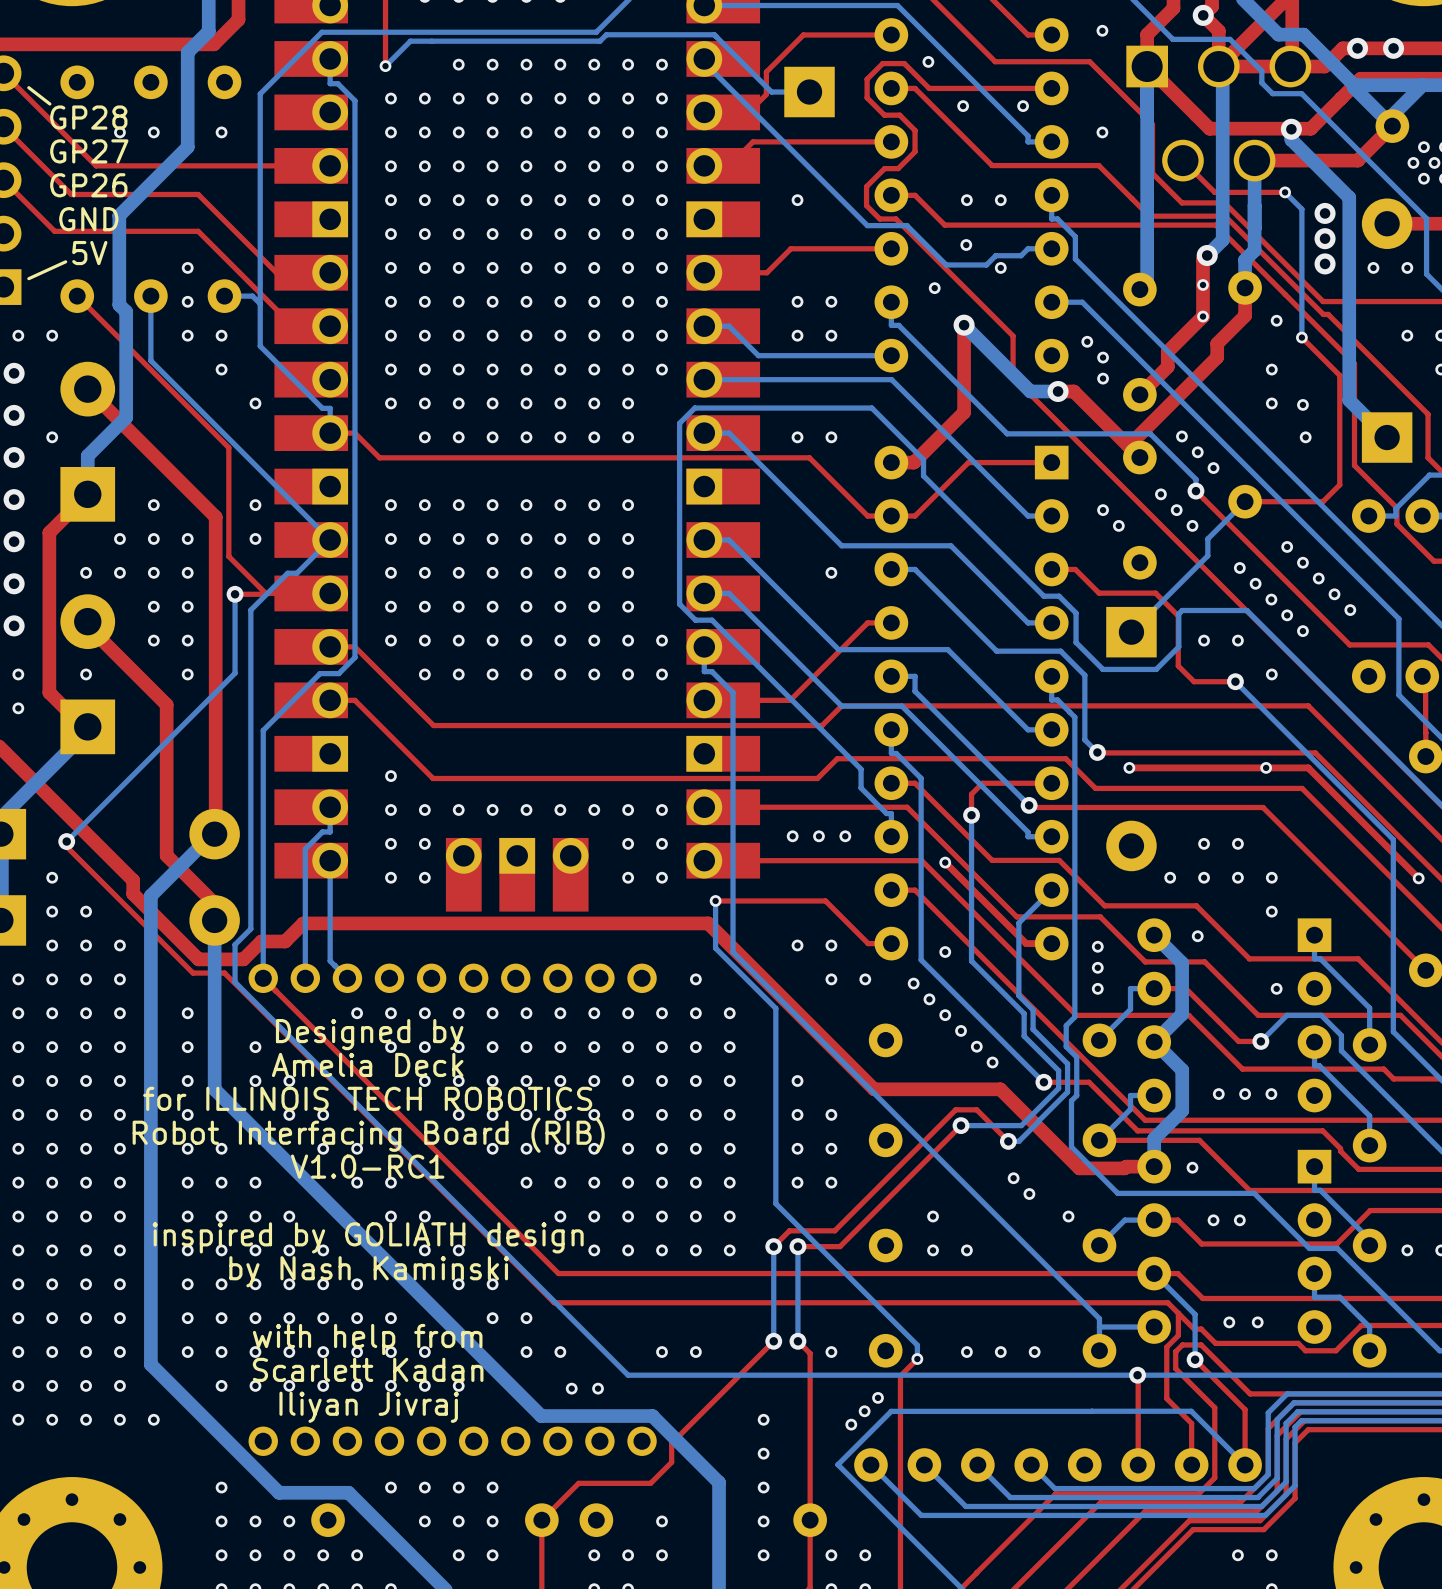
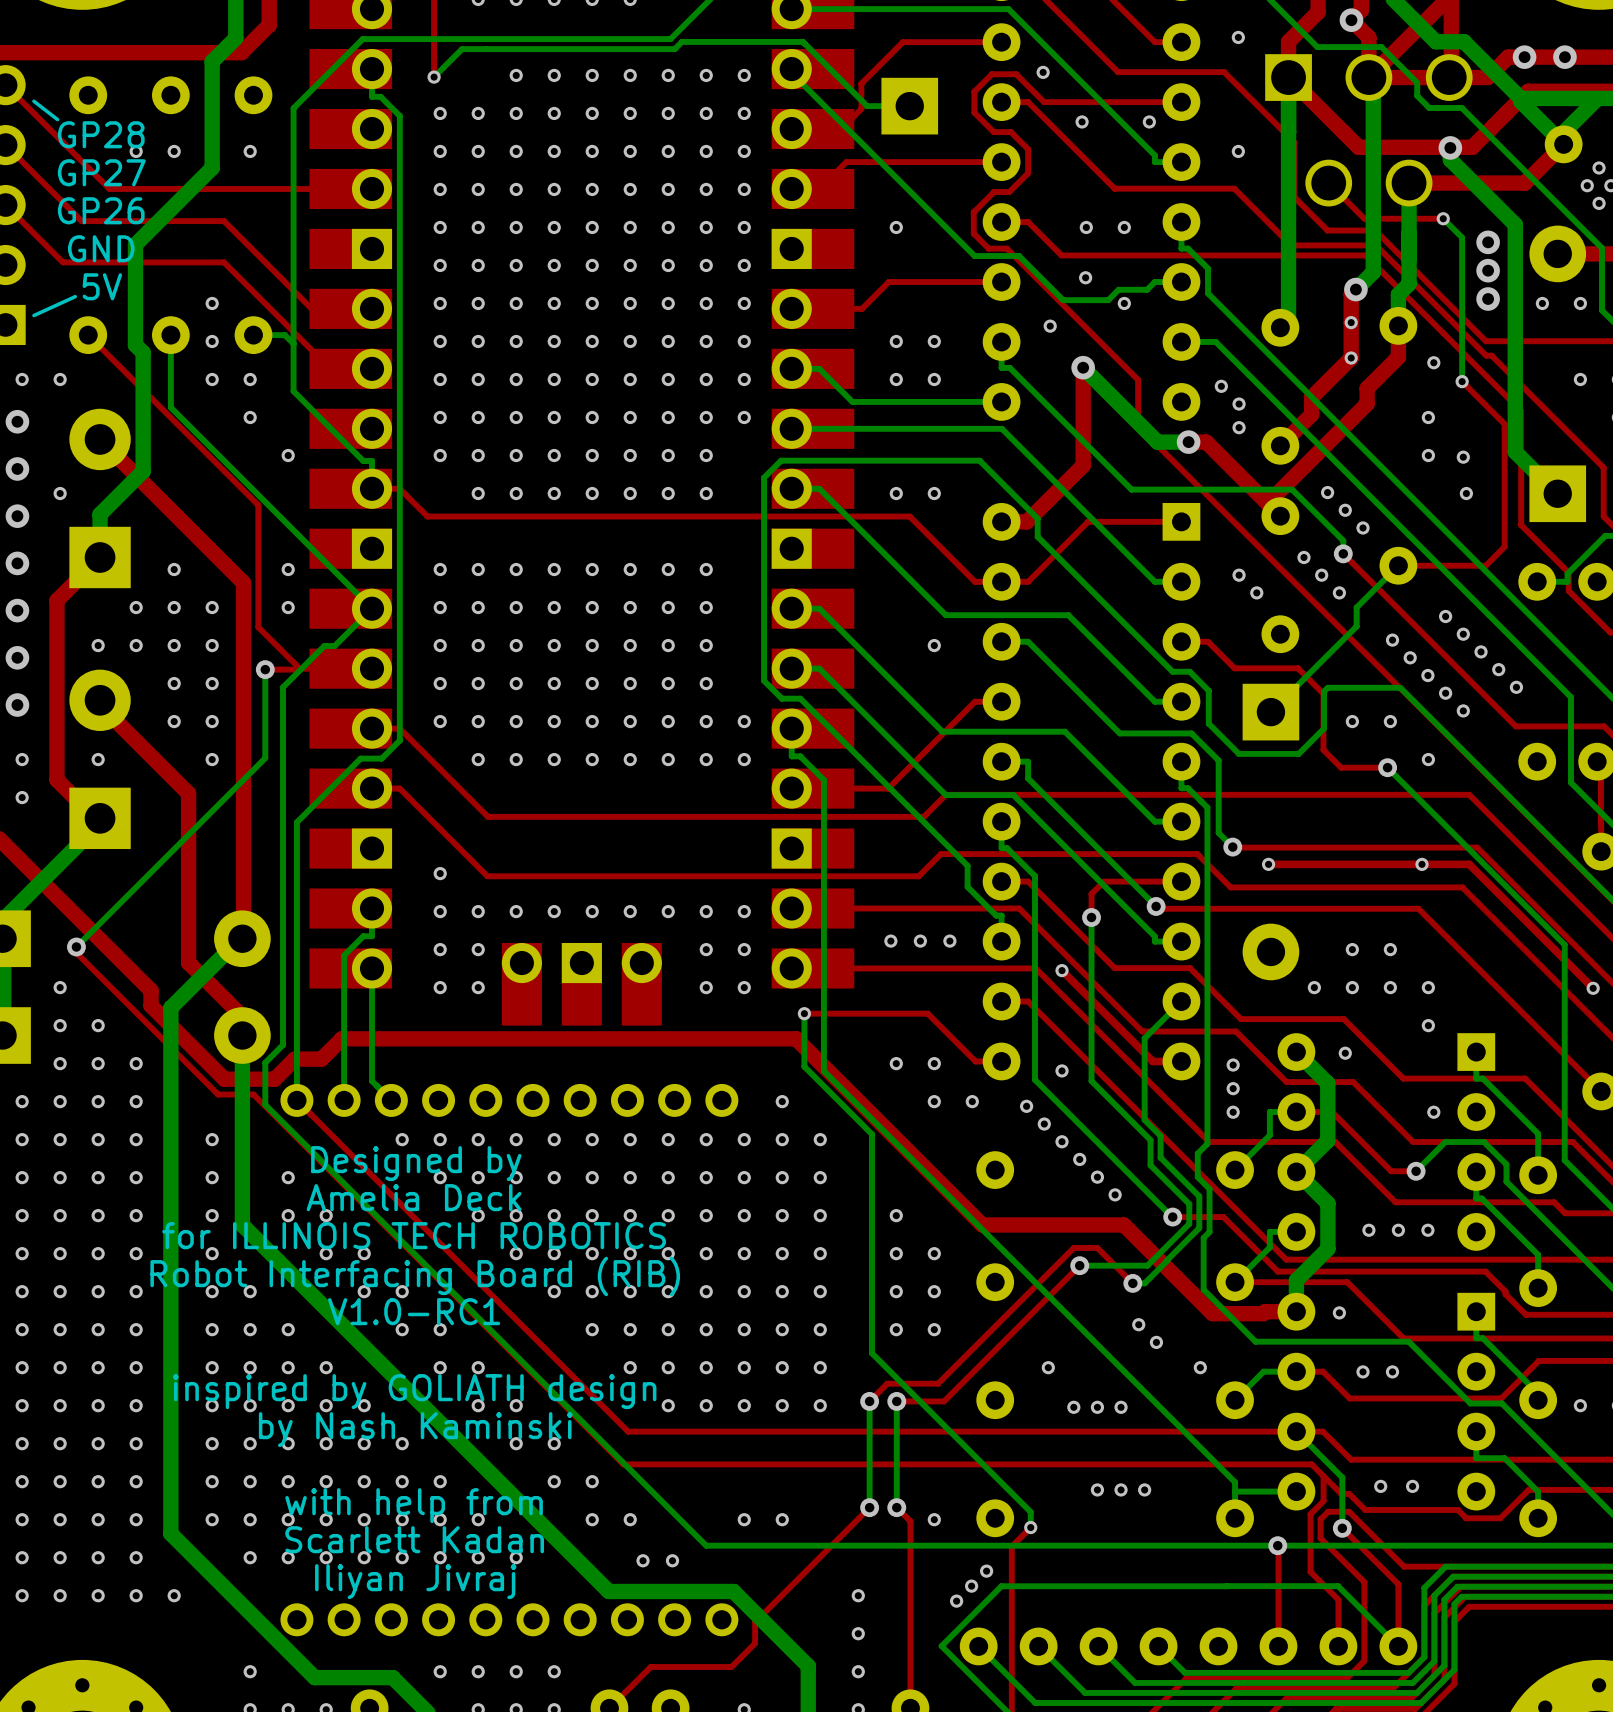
via: (933, 1250) -> none
via: (966, 1250) -> none
via: none -> (1073, 1407)
via: none -> (1097, 1407)
via: none -> (1121, 1407)
via: none -> (1097, 1489)
via: none -> (1121, 1489)
via: none -> (1144, 1489)
via: (966, 1352) -> none
via: (1000, 1352) -> none
via: (1034, 1352) -> none

